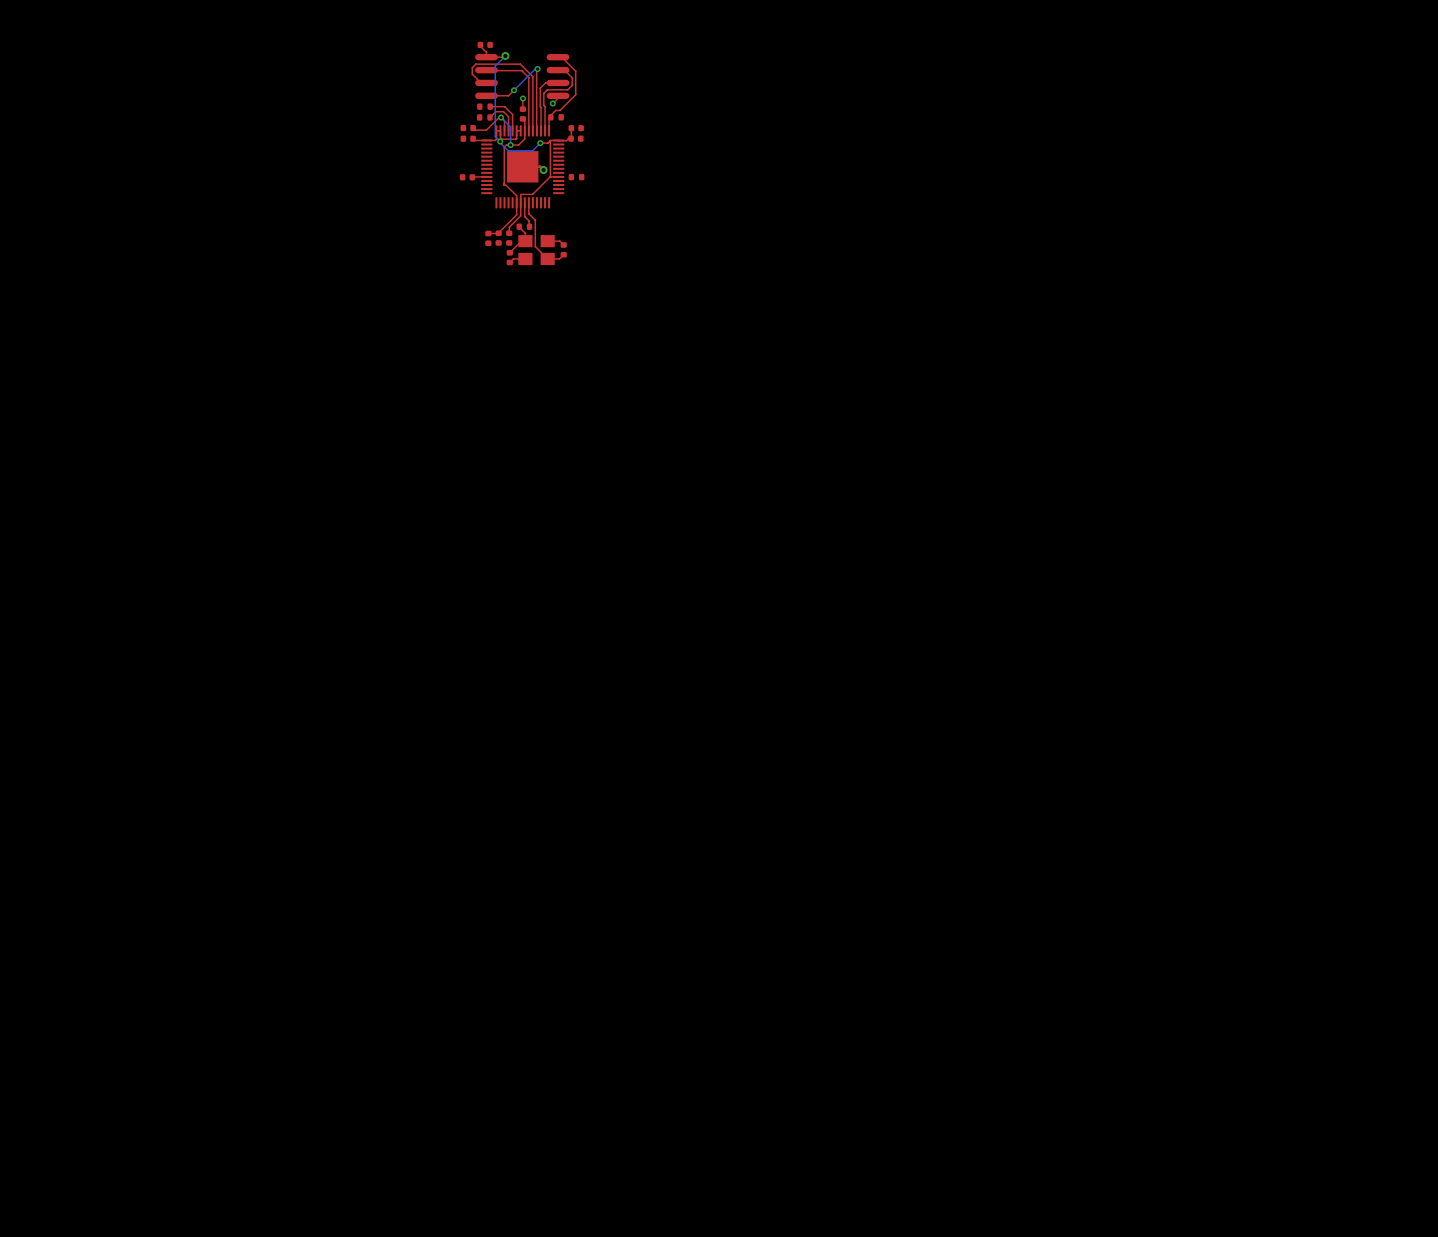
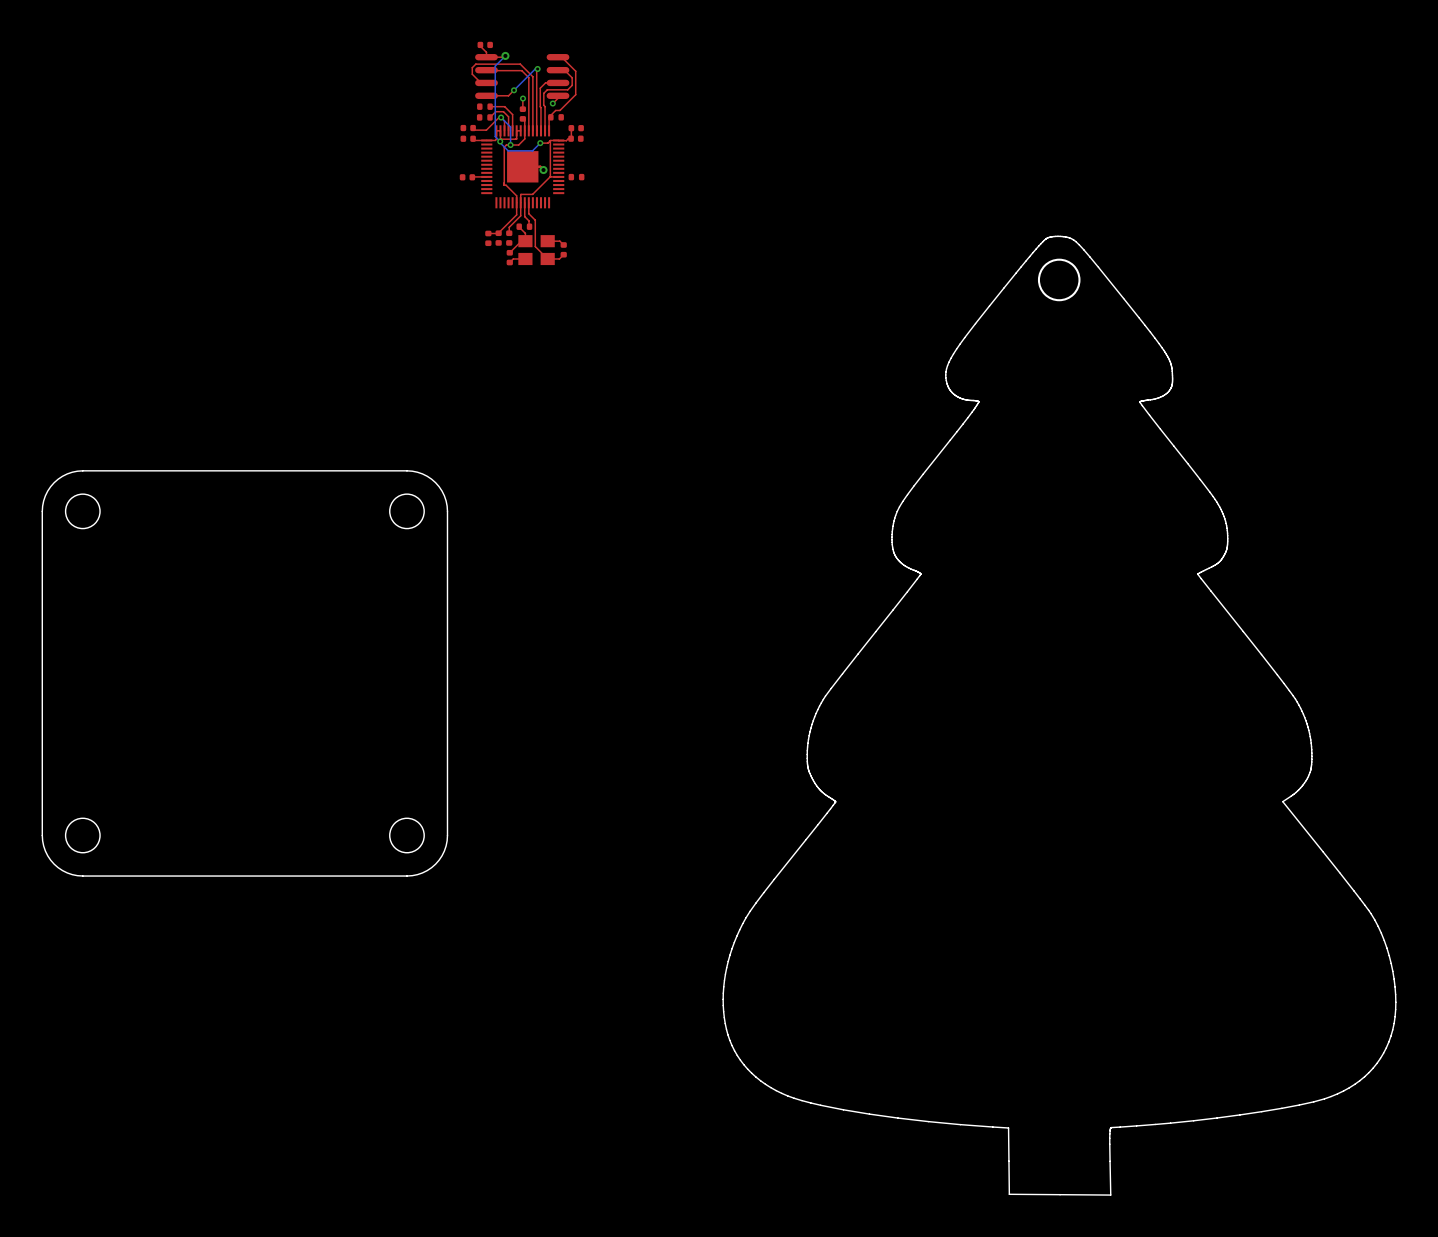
round board edge: none -> [1037, 258, 1081, 302]
board edge: none -> (978, 401) (907, 494) (895, 515) (892, 534) (894, 553) (902, 563) (920, 573)
board edge: none -> (1139, 401) (1213, 496) (1224, 518) (1227, 538) (1225, 553) (1217, 563) (1197, 574)
board edge: none -> (1140, 401) (1160, 397) (1170, 389) (1172, 375) (1168, 358) (1150, 332) (1083, 249) (1073, 239) (1058, 236) (1047, 238) (1036, 249) (975, 323) (949, 362) (945, 377) (950, 390) (960, 398) (978, 401)
board edge: none -> (406, 470) (82, 470) (67, 473) (54, 482) (45, 495) (42, 511) (42, 835) (45, 851) (54, 864) (67, 872) (82, 876) (406, 876) (422, 872) (435, 864) (444, 851) (447, 835) (447, 506) (442, 491) (435, 482) (422, 473) (406, 470)
round board edge: none -> [65, 493, 101, 530]
round board edge: none -> [389, 493, 425, 530]
board edge: none -> (920, 574) (831, 688) (814, 717) (807, 743) (808, 768) (818, 788) (835, 801)
board edge: none -> (1197, 574) (1283, 683) (1300, 708) (1310, 736) (1311, 768) (1301, 786) (1282, 801) (1370, 913) (1381, 933) (1389, 955) (1394, 979) (1395, 1002) (1390, 1036) (1376, 1063) (1364, 1076) (1349, 1087) (1324, 1098) (1281, 1108) (1193, 1120) (1111, 1127) (1110, 1195) (1009, 1194) (1008, 1127) (928, 1121) (869, 1114) (810, 1102) (776, 1090) (760, 1080) (747, 1069) (737, 1055) (729, 1040) (723, 1005) (726, 967) (736, 936) (750, 911) (835, 801)
round board edge: none -> [65, 817, 101, 854]
round board edge: none -> [389, 817, 425, 854]

